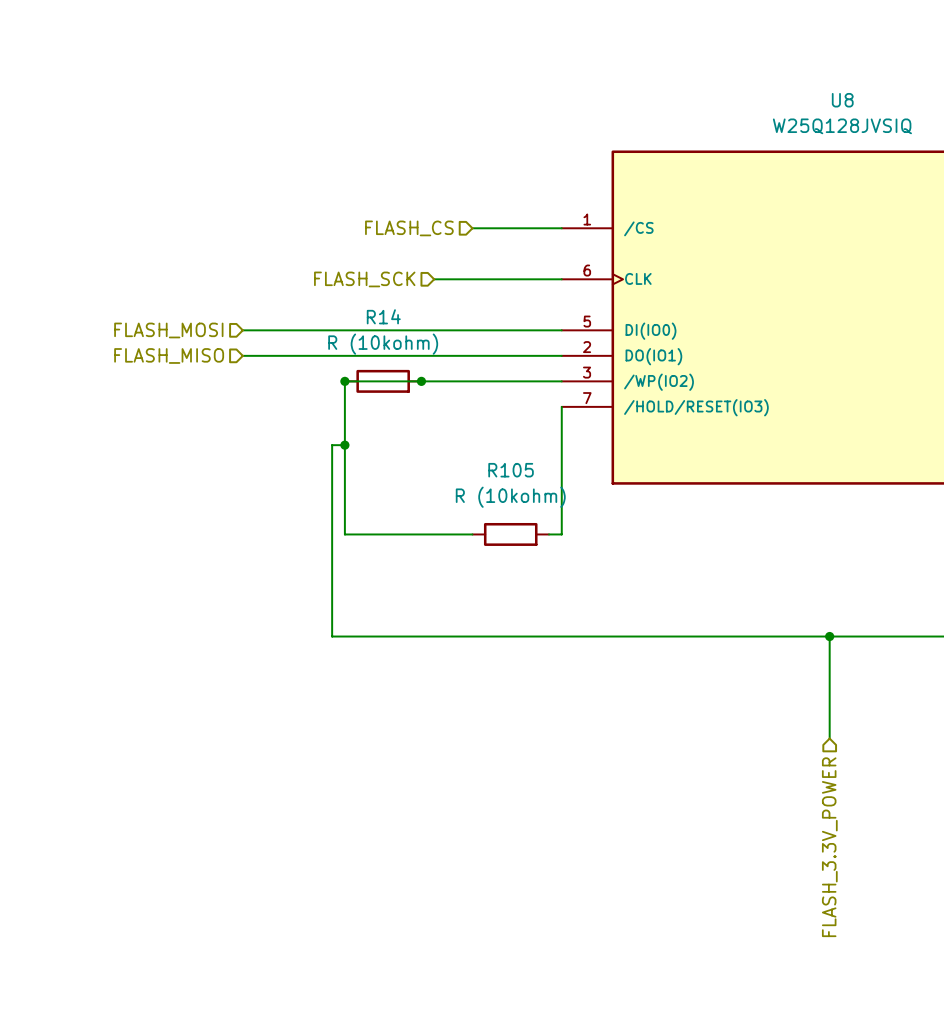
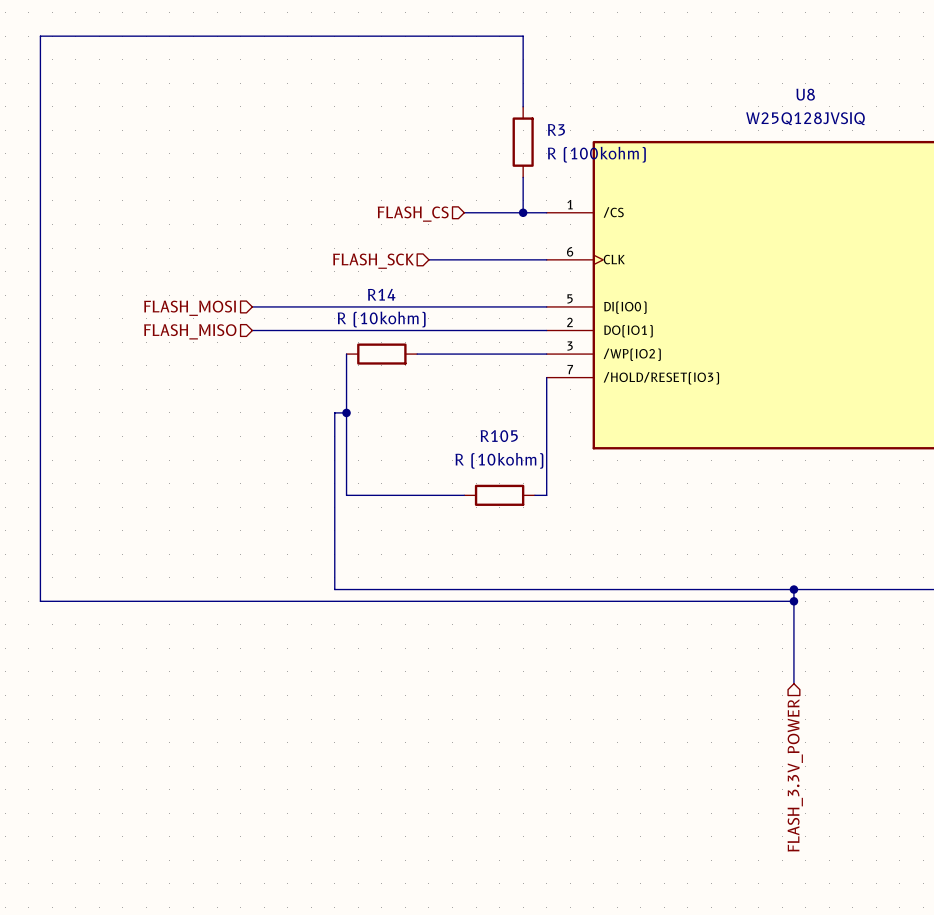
wire: none -> (523, 106) (523, 36) (40, 36) (40, 601) (793, 601)
R3: none -> R (100kohm) (523, 142)
wire: none -> (523, 177) (523, 212)
junction: none -> (523, 212)
wire: (344, 381) (421, 381) -> none
junction: (344, 381) -> none
junction: (421, 381) -> none
junction: none -> (793, 601)

